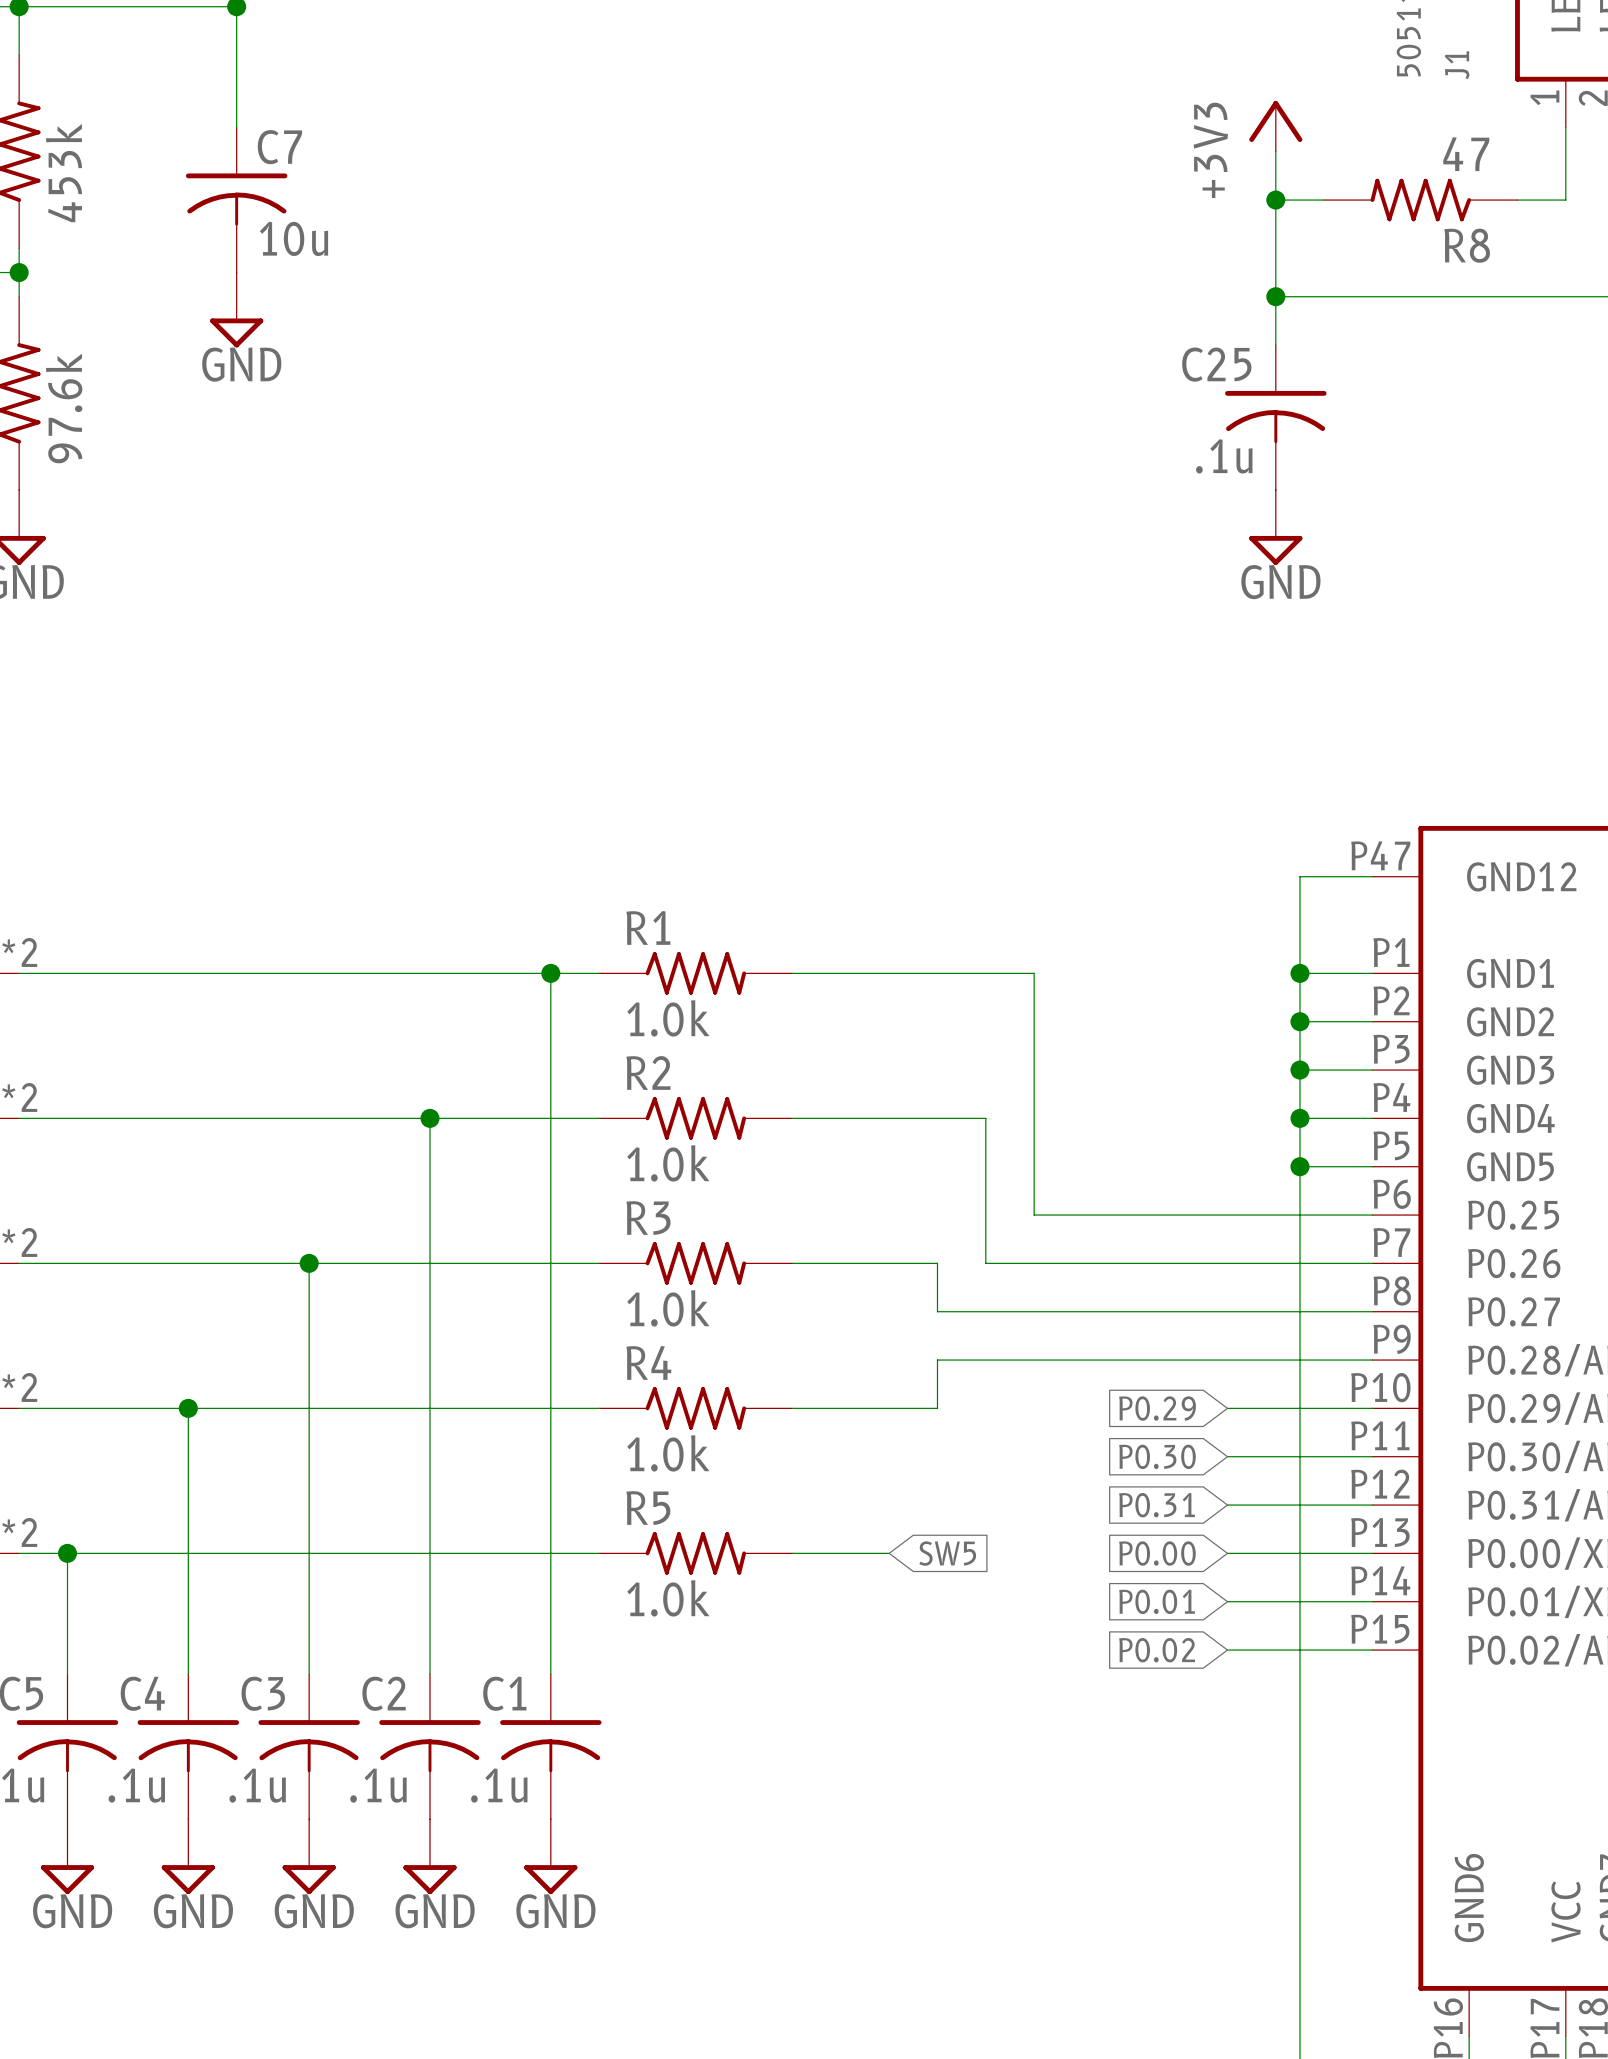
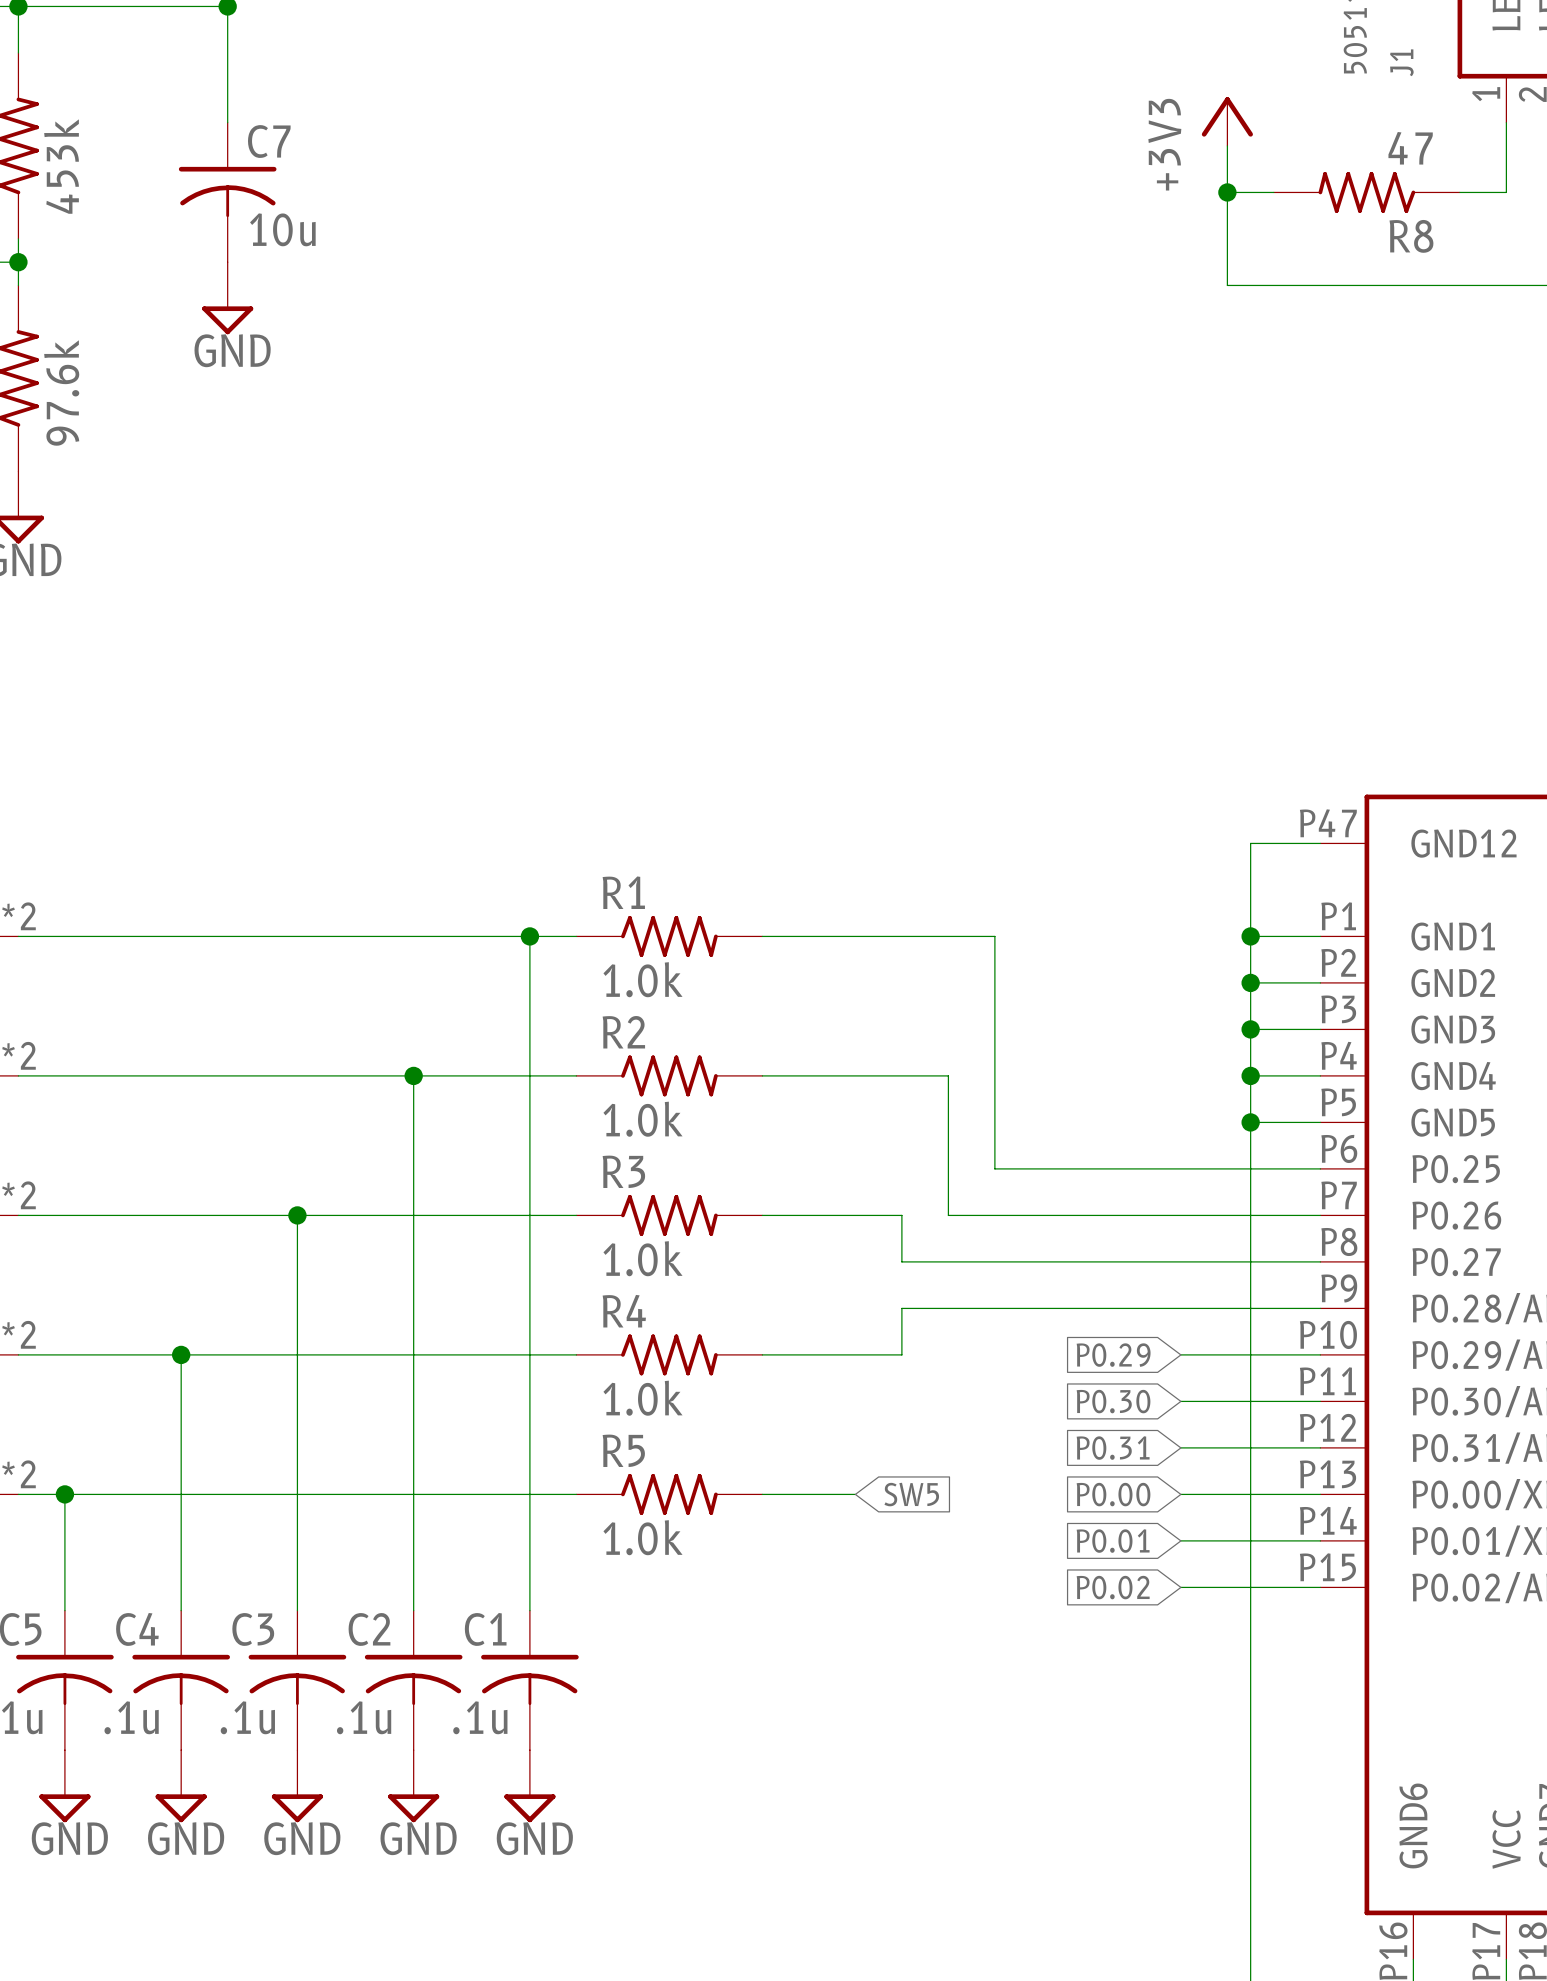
wire: (1275, 296) (1275, 345) -> none
junction: (1275, 296) -> none
C25: .1u (1275, 417) -> none
power symbol: GND (1275, 527) -> none

